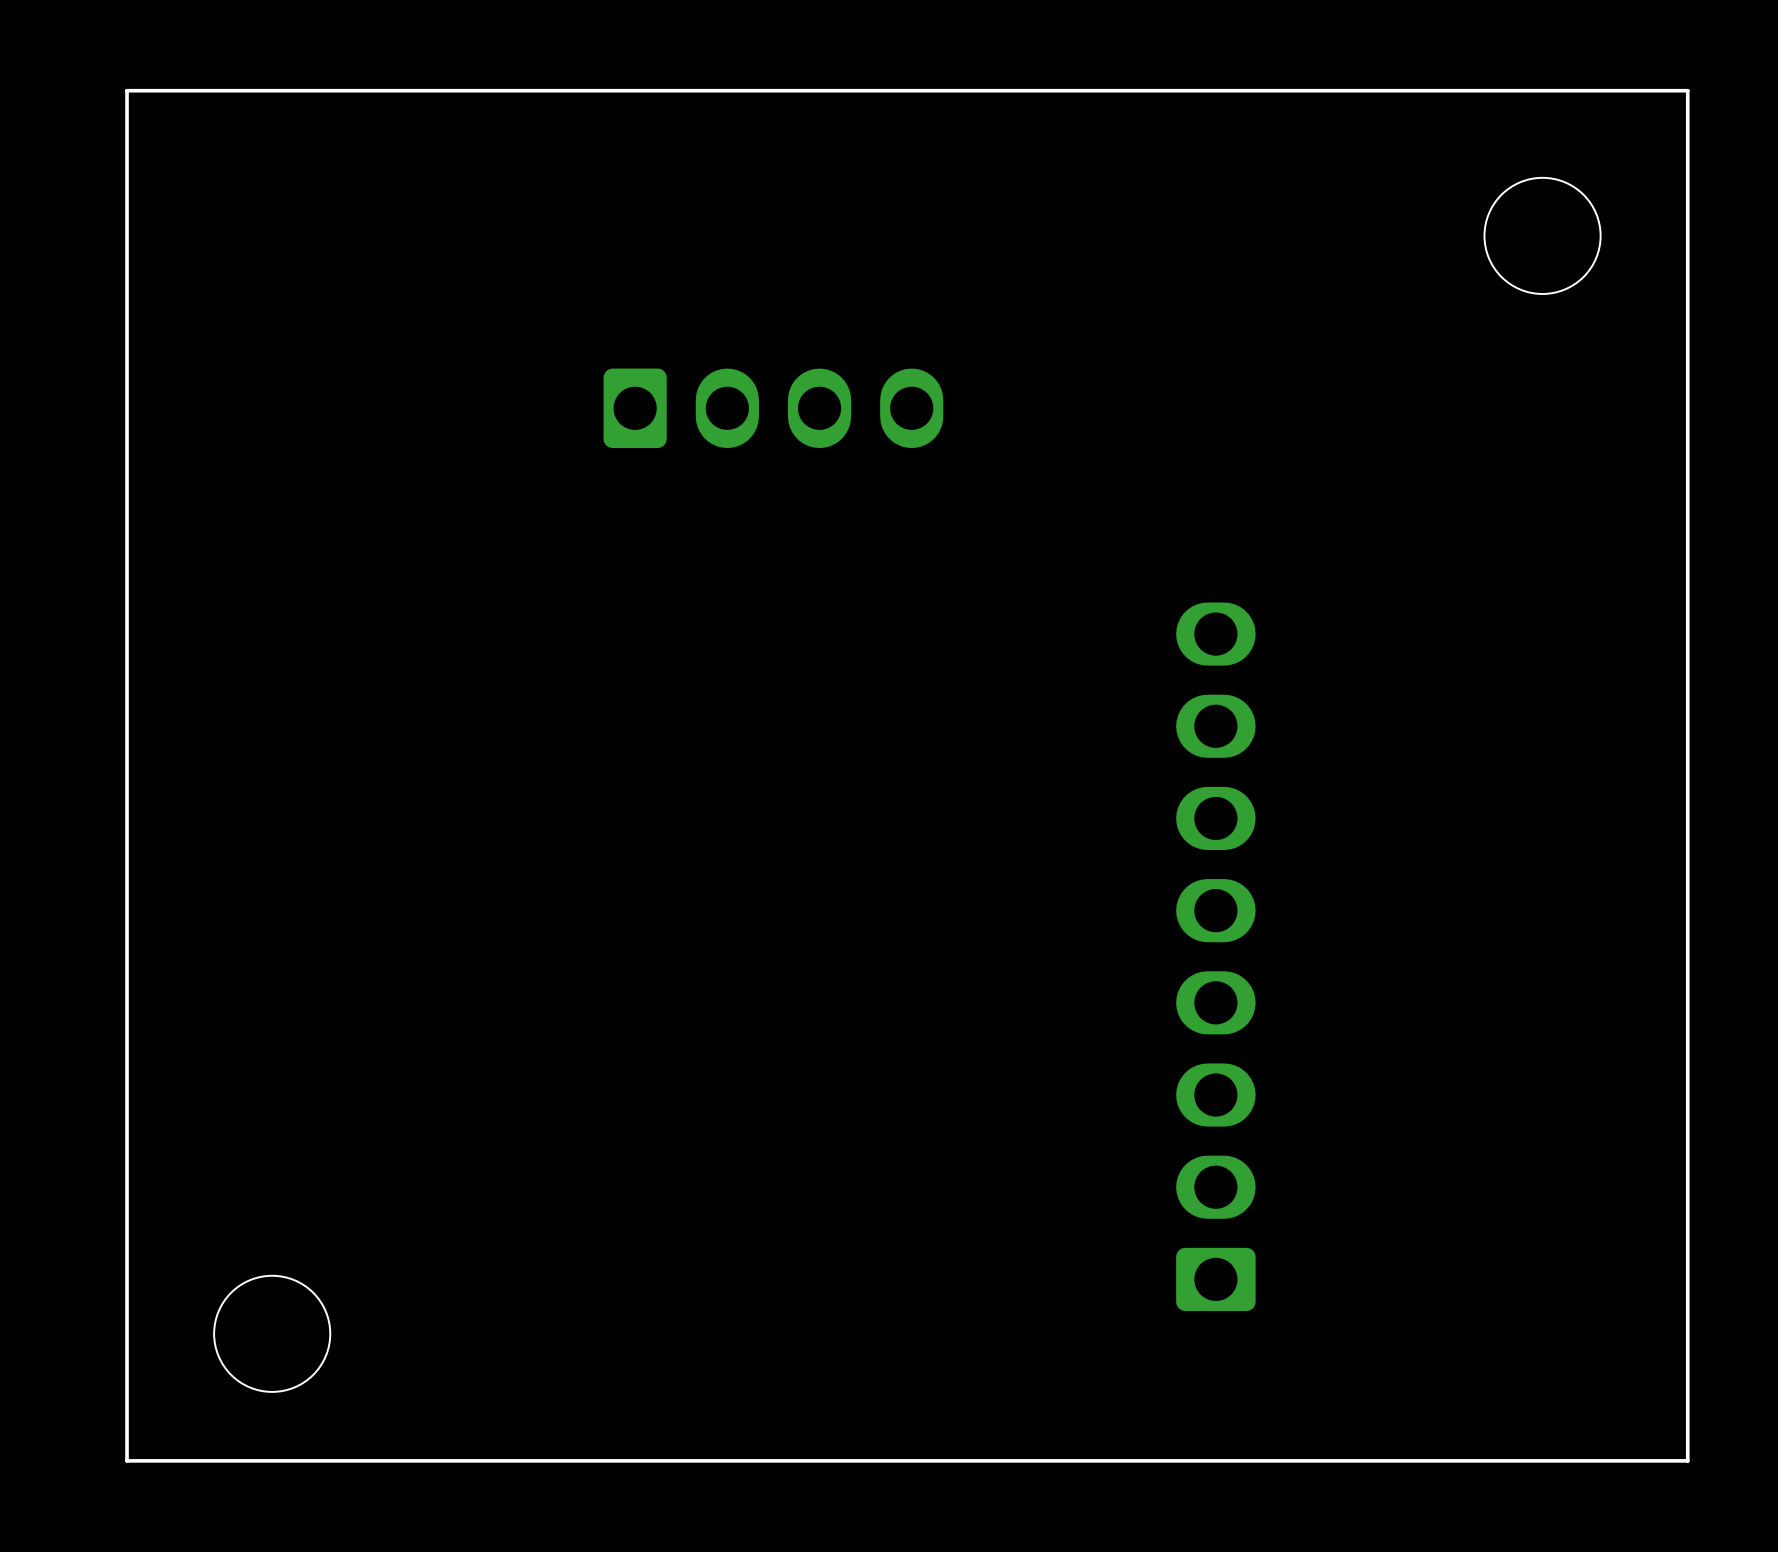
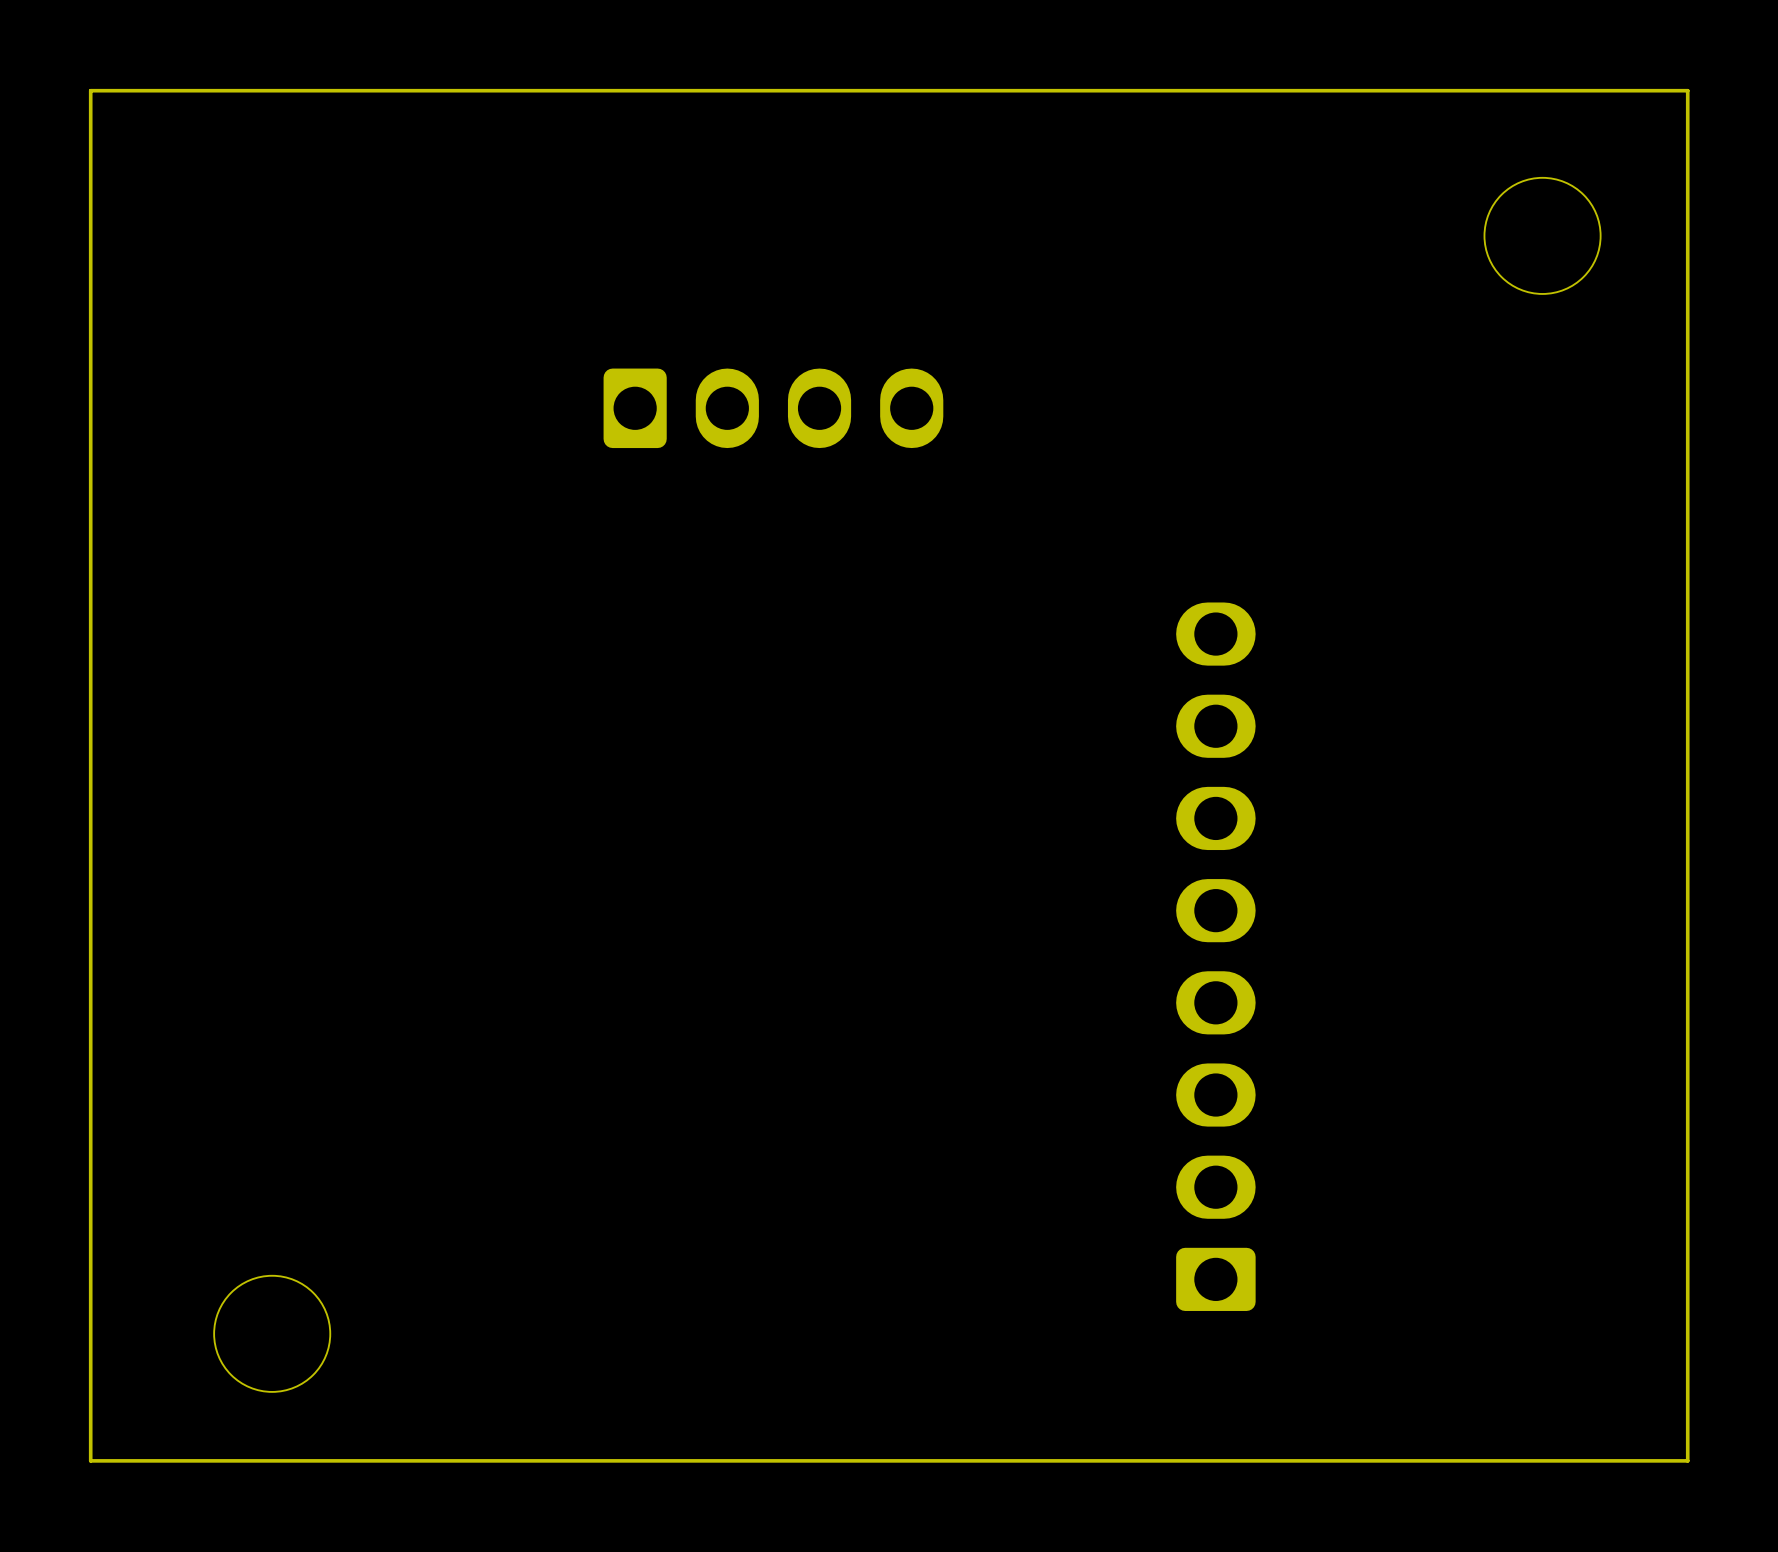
board edge: (127, 90) (127, 1460) -> (127, 90) (90, 90) (90, 1460) (127, 1460)

